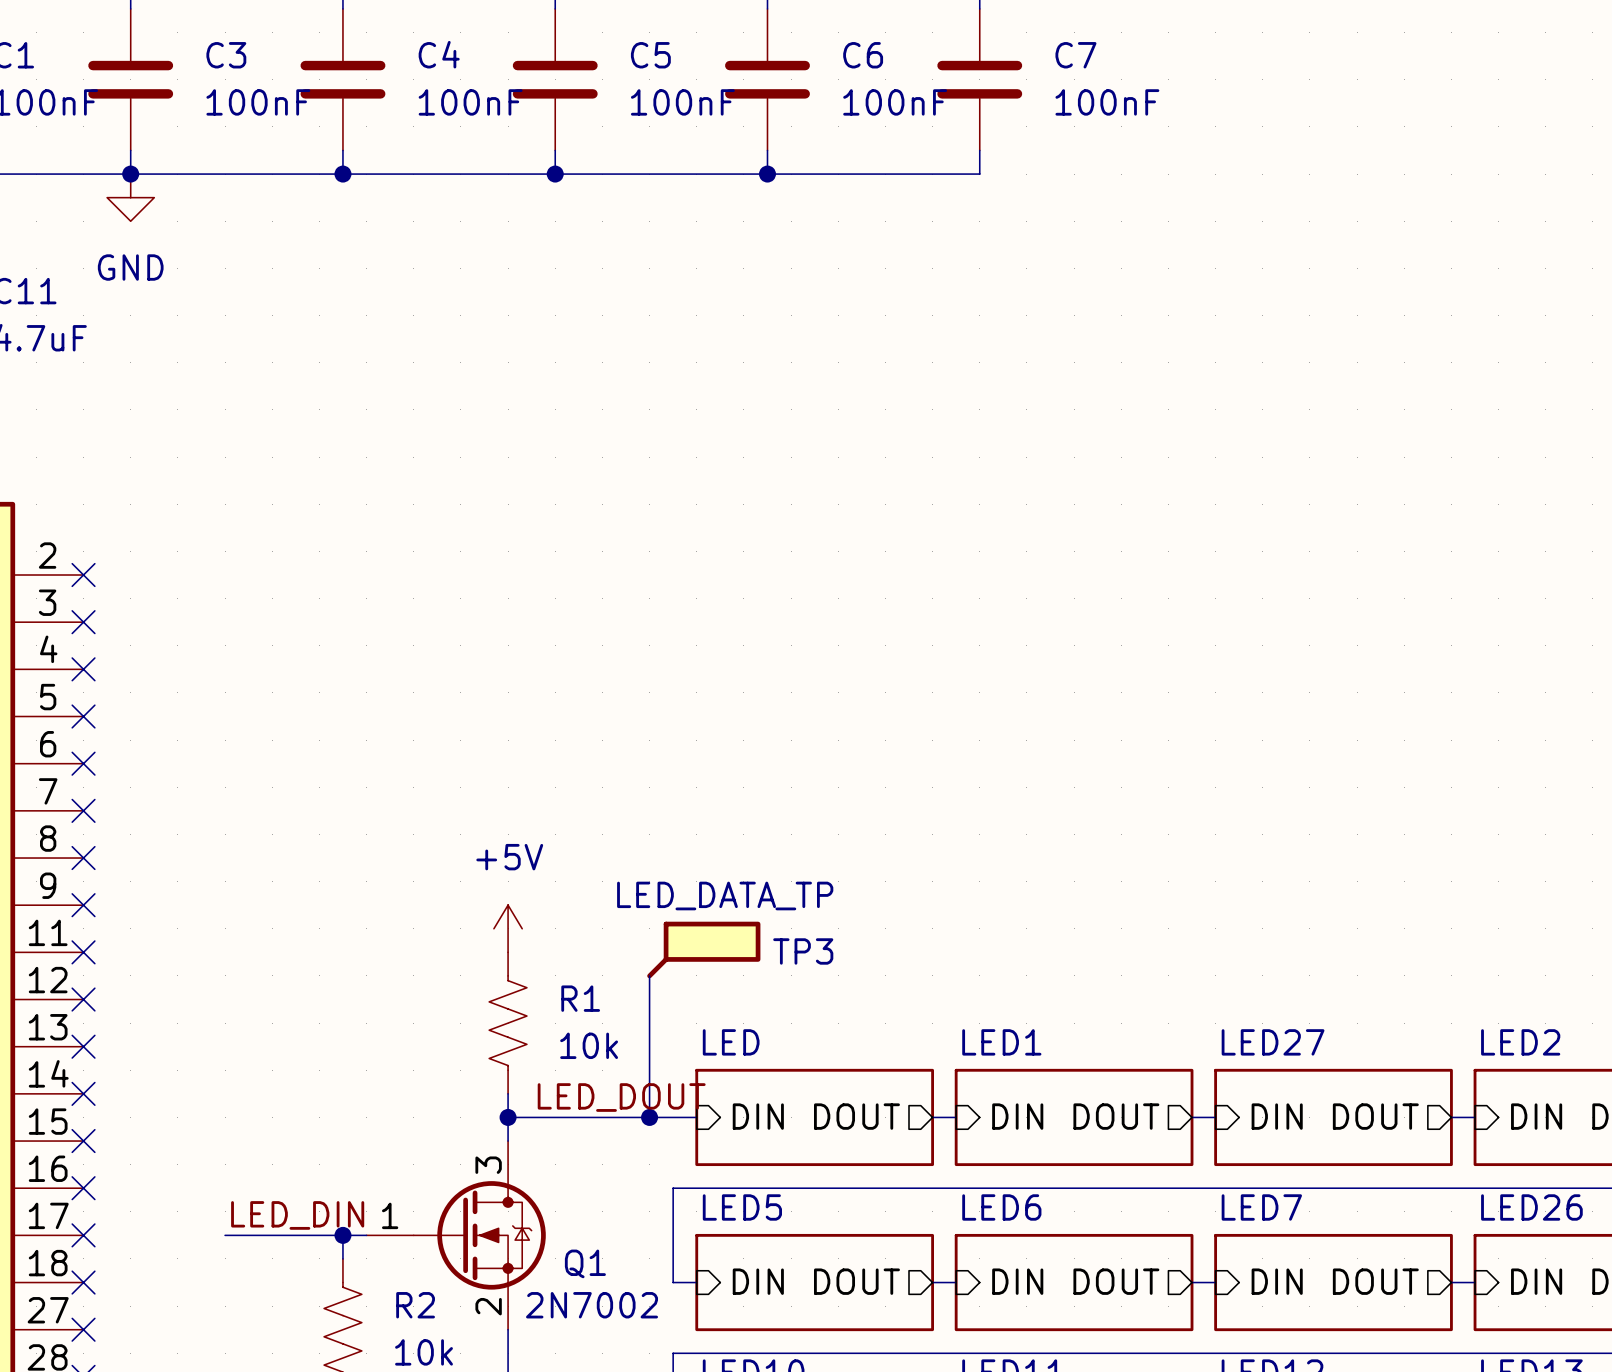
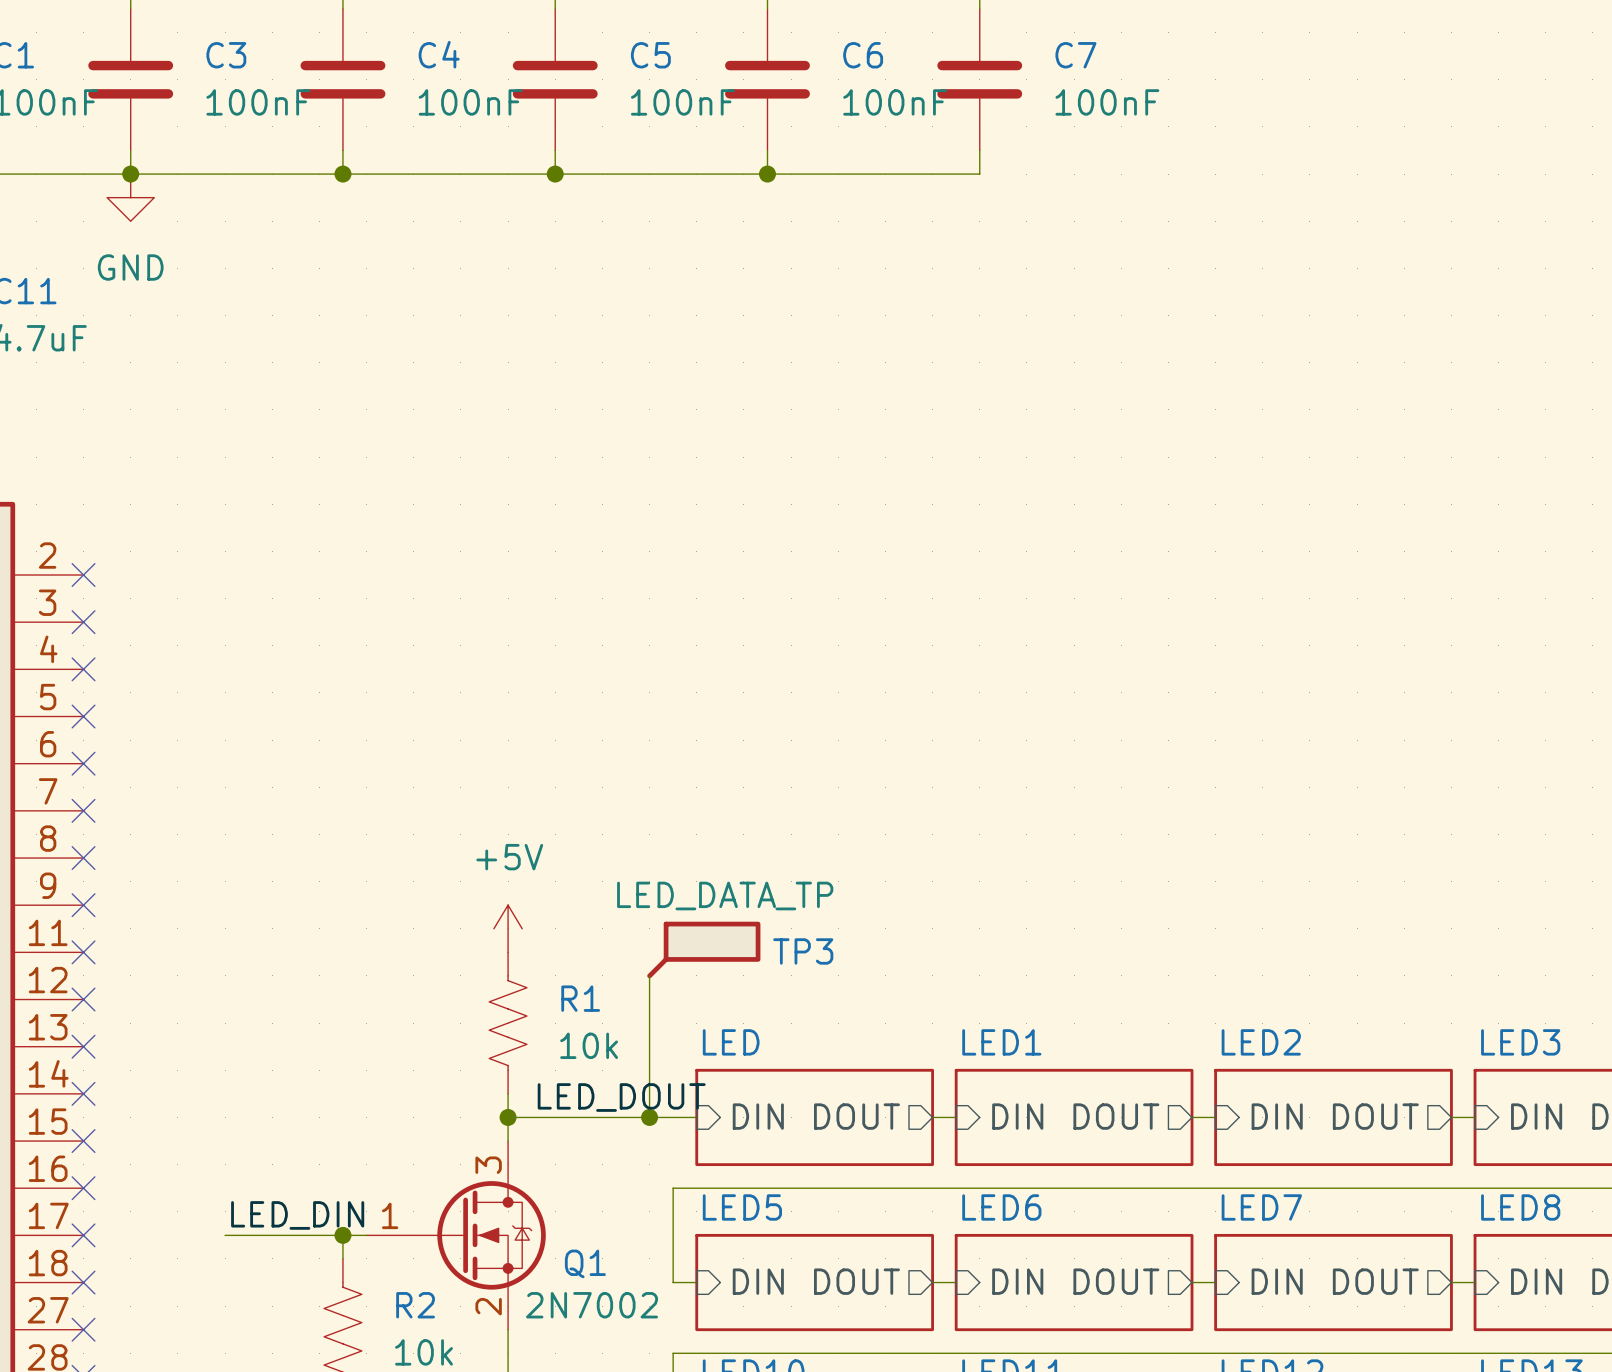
sheet LED27 name: LED27 (1273, 1042) -> LED2 (1261, 1042)
sheet LED2 name: LED2 (1520, 1042) -> LED3 (1520, 1042)
sheet LED26 name: LED26 (1531, 1207) -> LED8 (1520, 1207)

